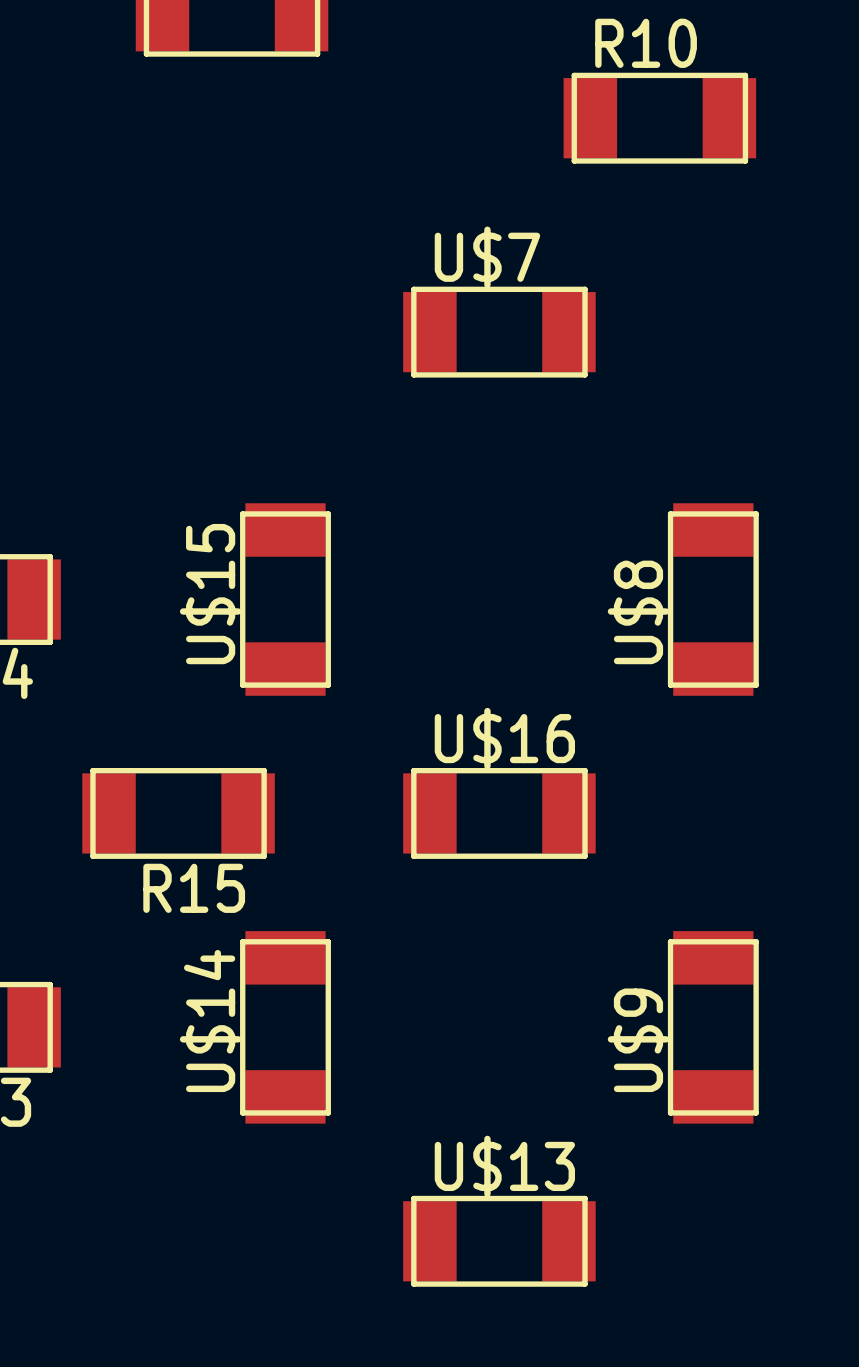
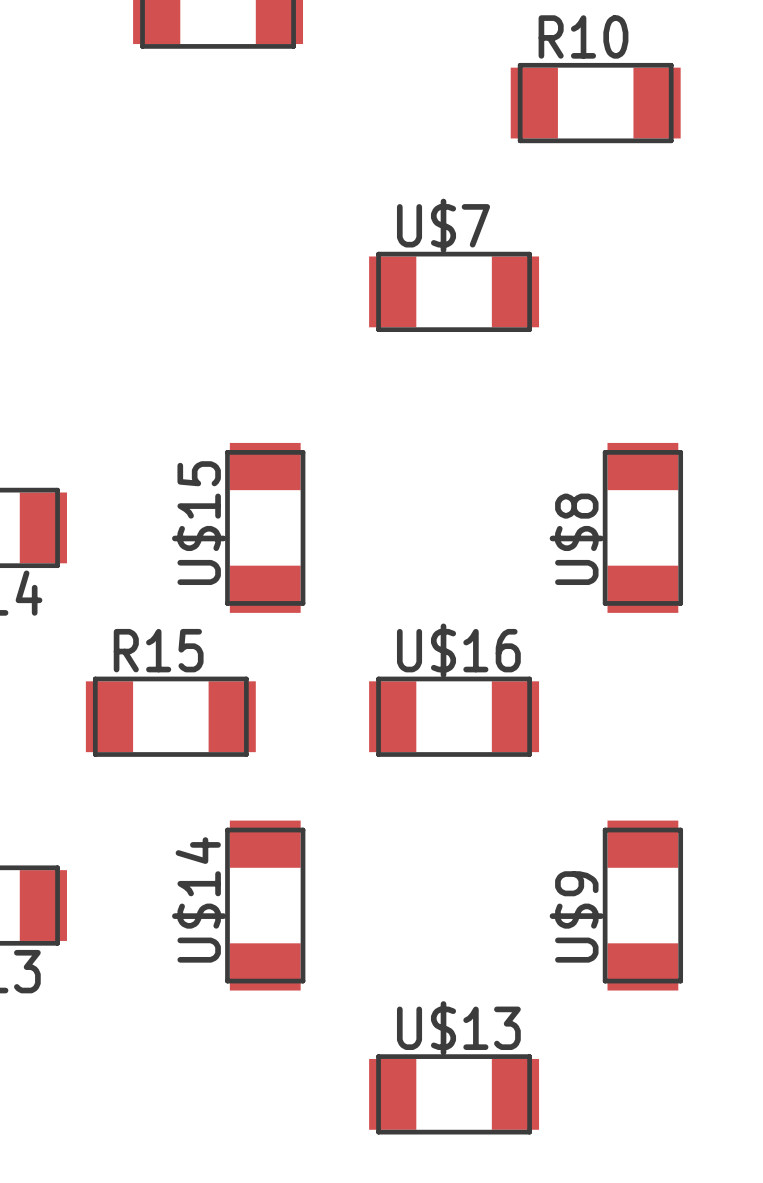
R15 name position: R15 (194, 888) -> R15 (158, 650)

